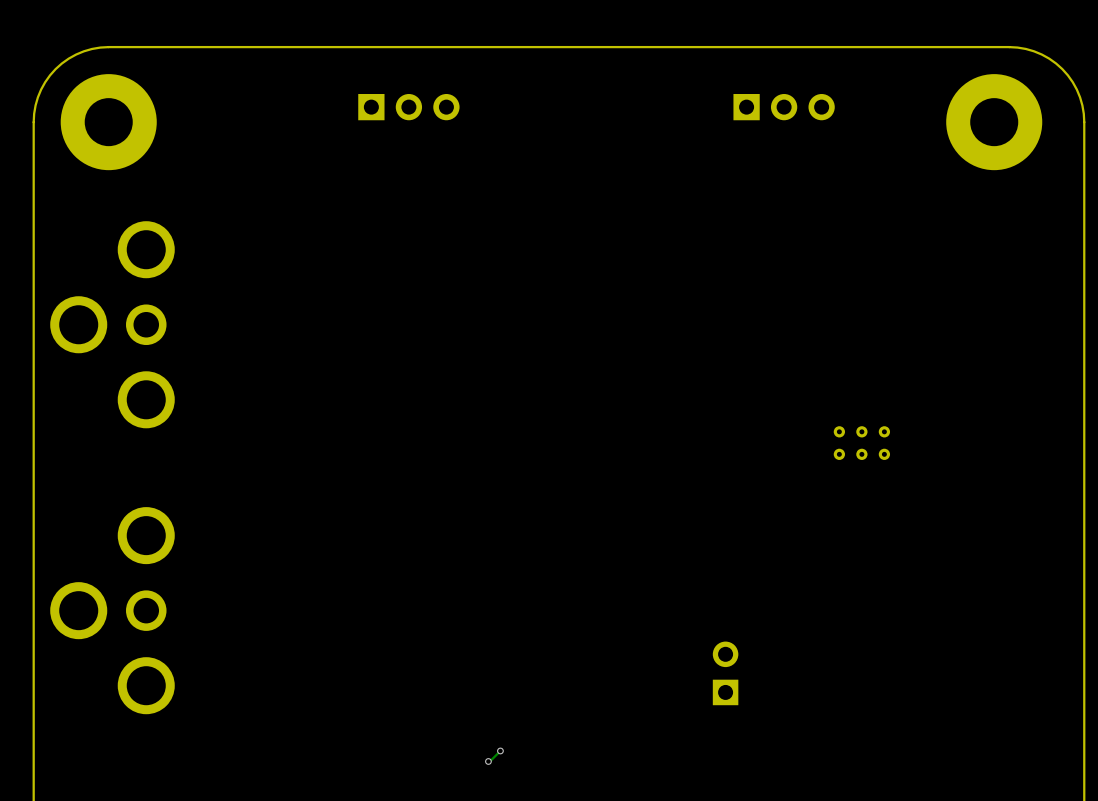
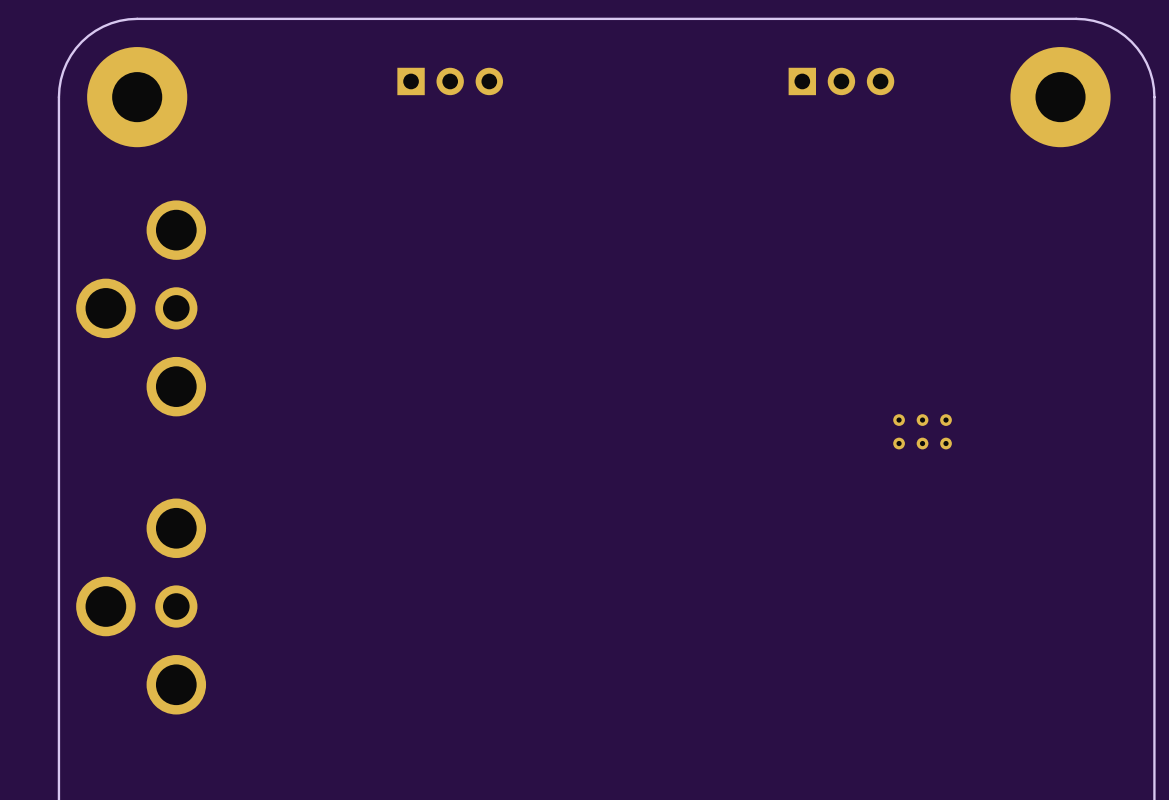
part: (725, 673) -> none
track: (500, 750) (488, 761) -> none
via: (500, 750) -> none
via: (488, 761) -> none

